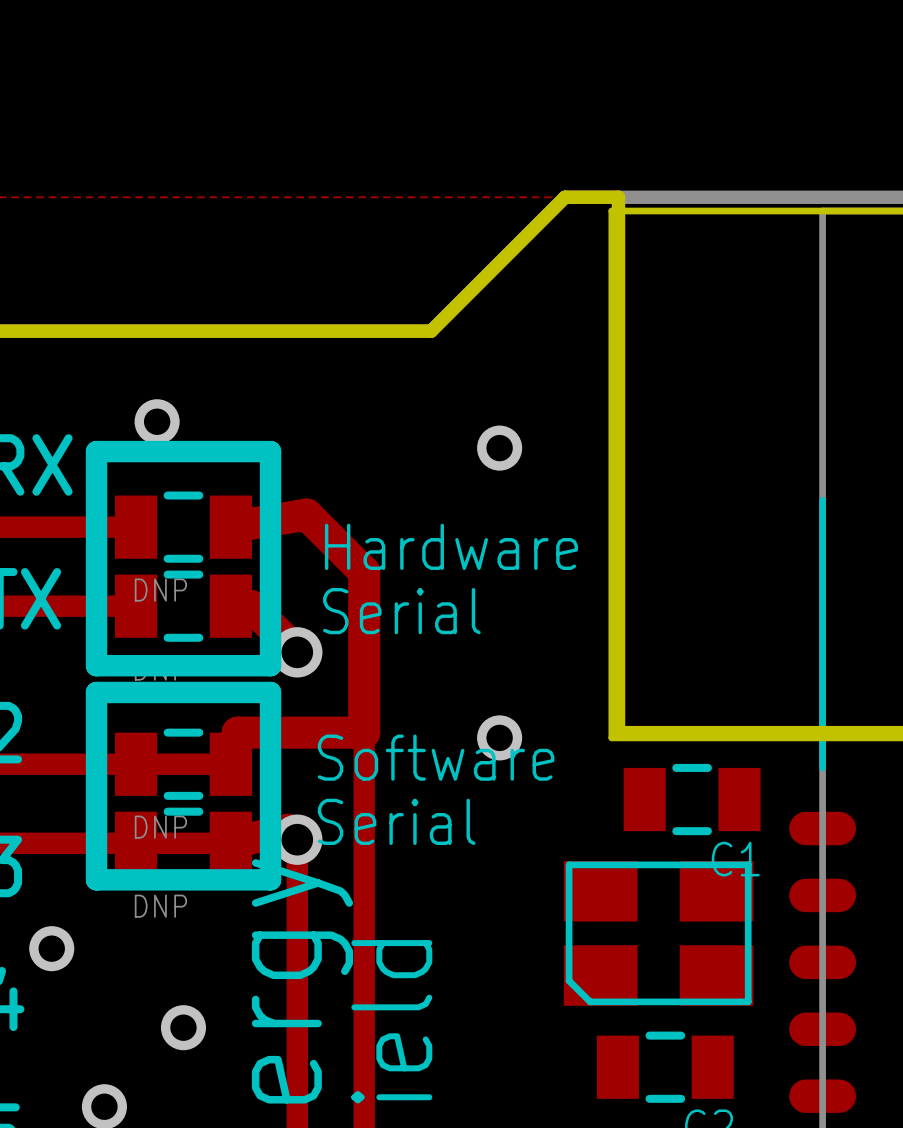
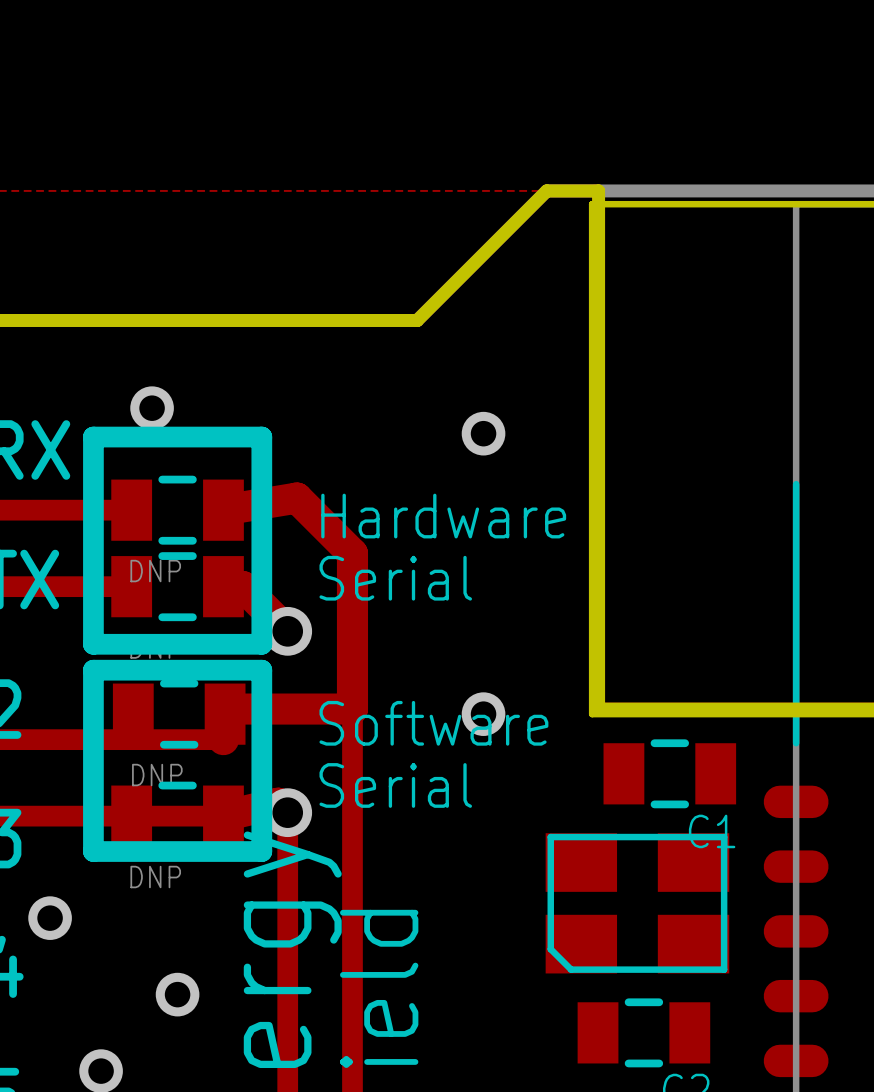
text position: Hardware (451, 546) -> Hardware (443, 516)
text position: Serial (401, 611) -> Serial (395, 578)
text position: Software (436, 757) -> Software (433, 723)
part position: (183, 764) -> (179, 714)
text position: Serial (396, 821) -> Serial (395, 785)

